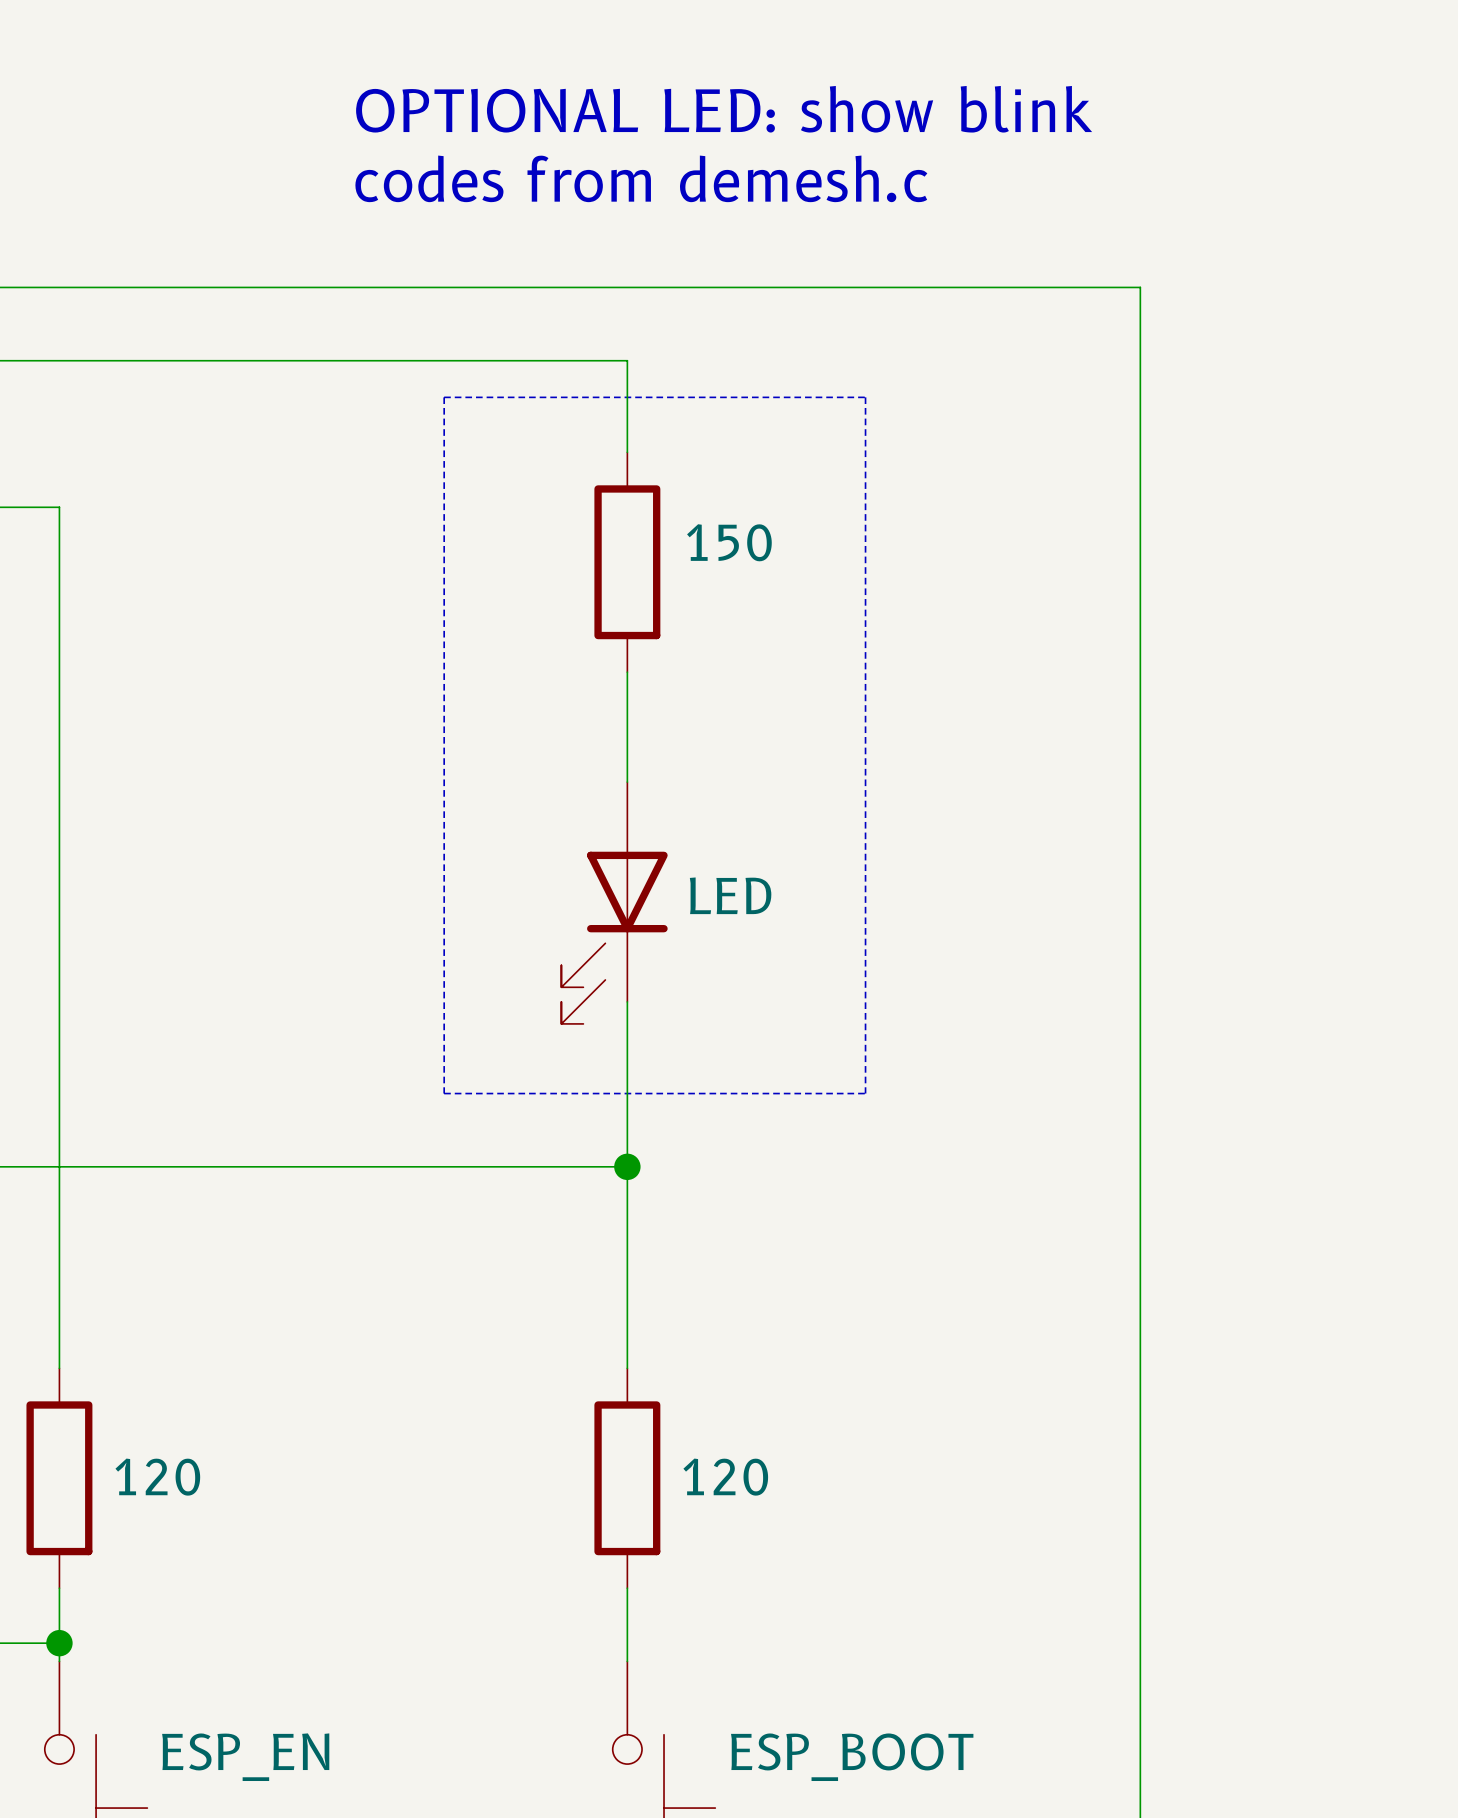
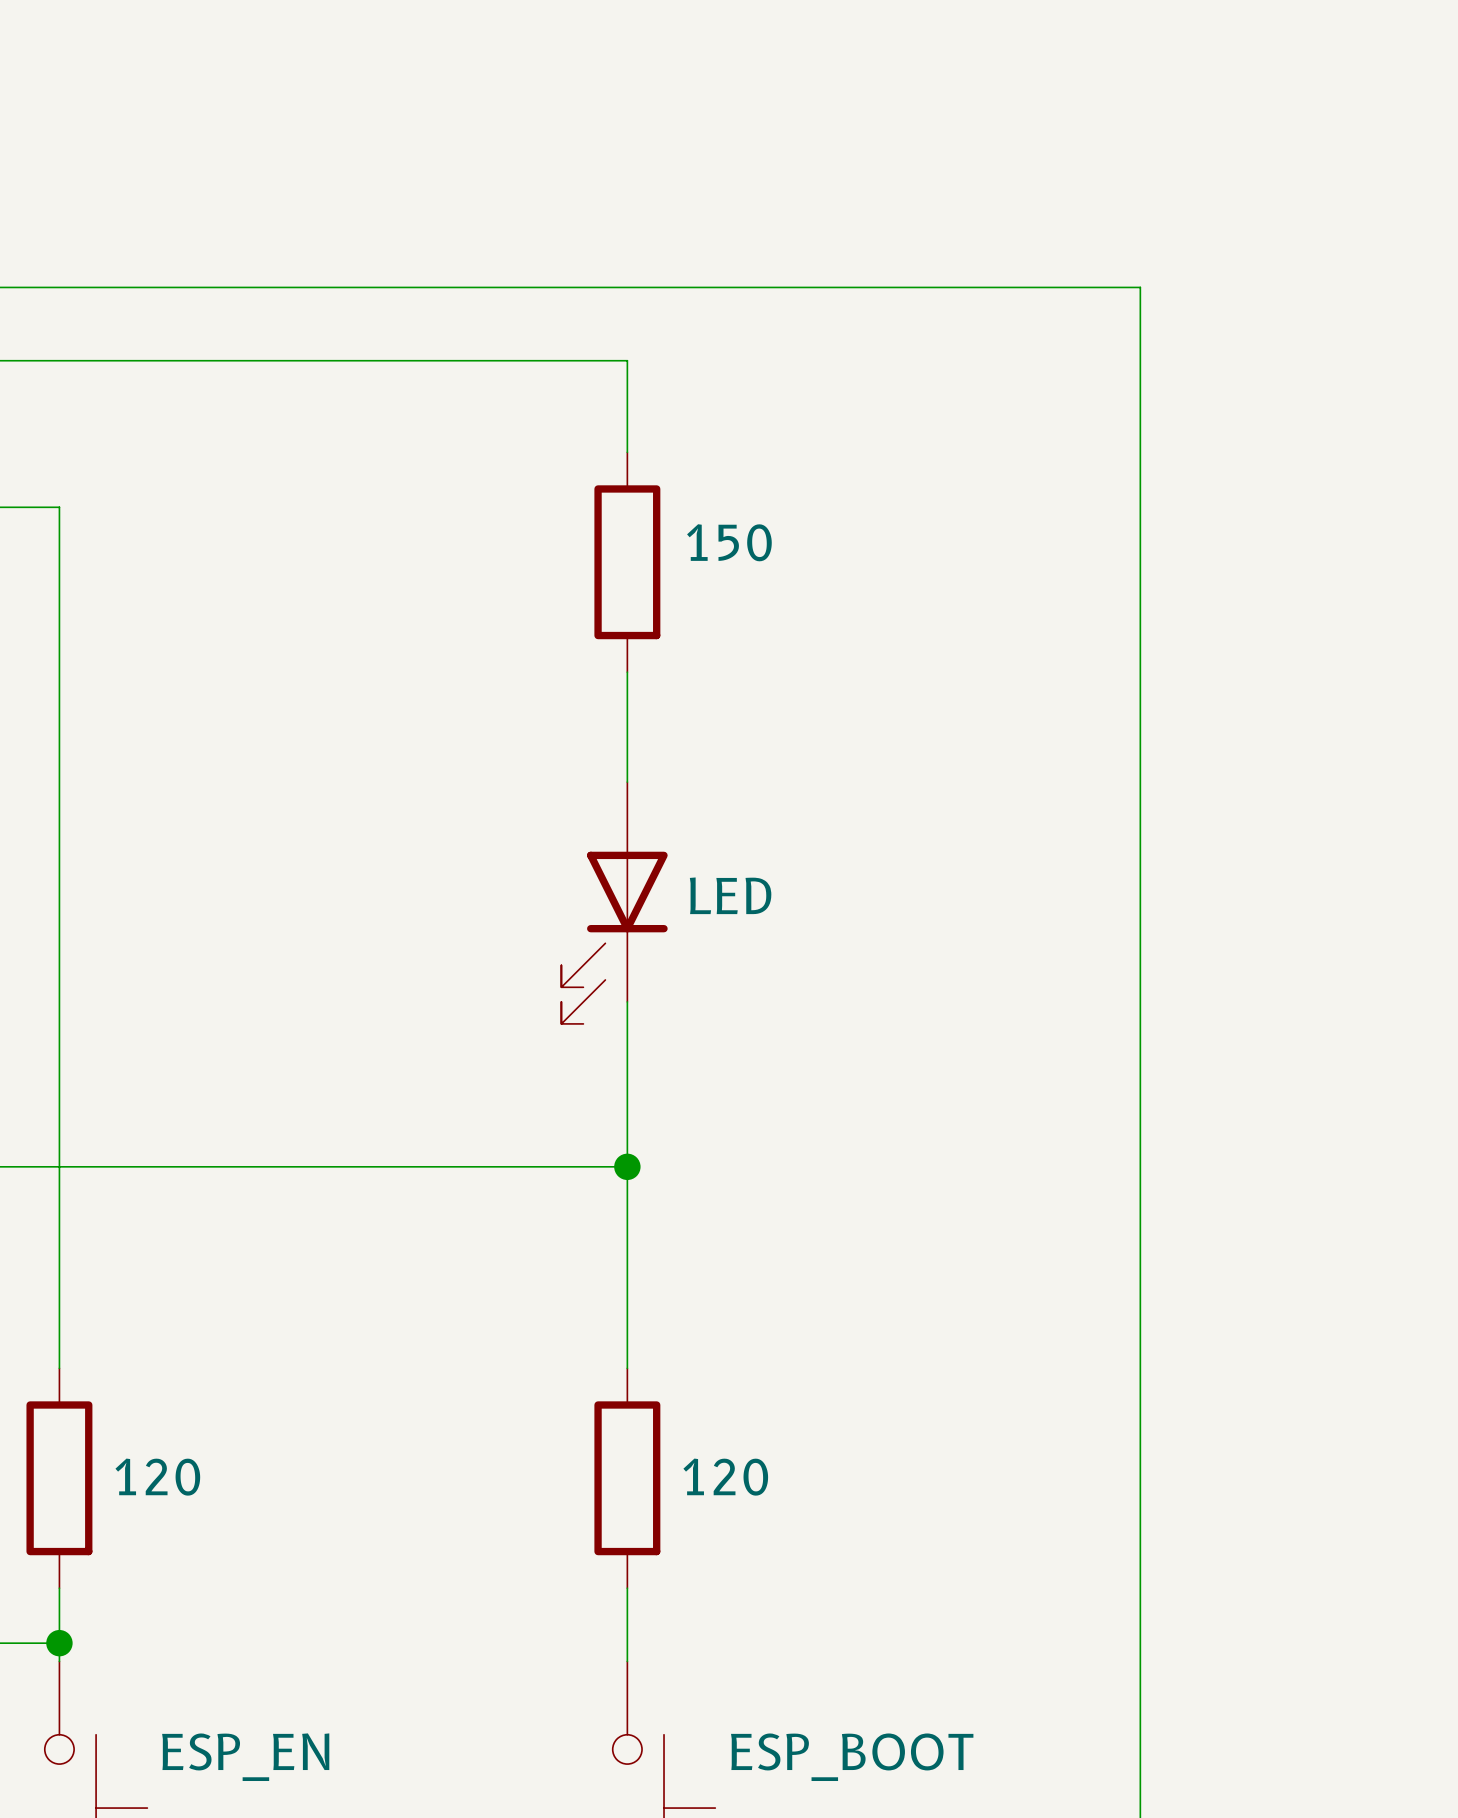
text: OPTIONAL LED: show blink (724, 109) -> none
text: codes from demesh.c (641, 178) -> none
line: (444, 397) (865, 397) (865, 1093) (444, 1093) (444, 397) -> none

